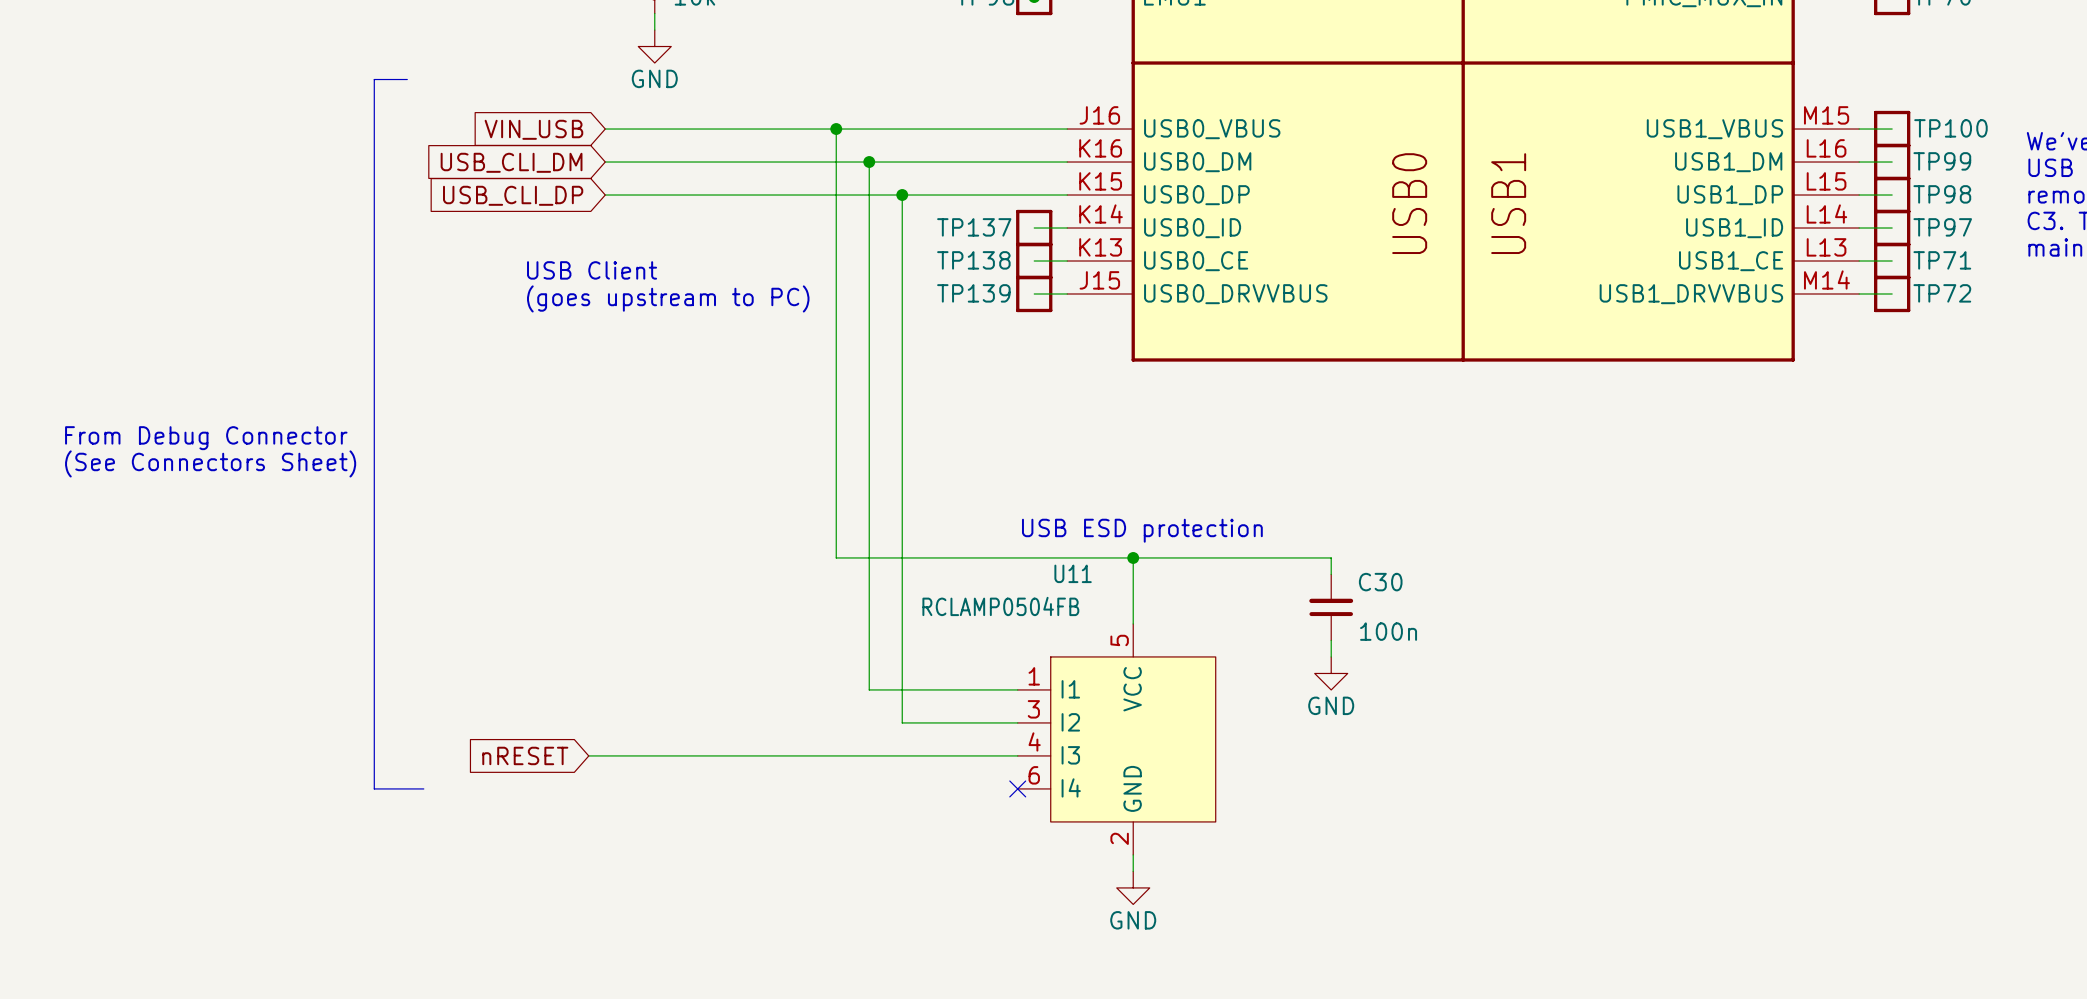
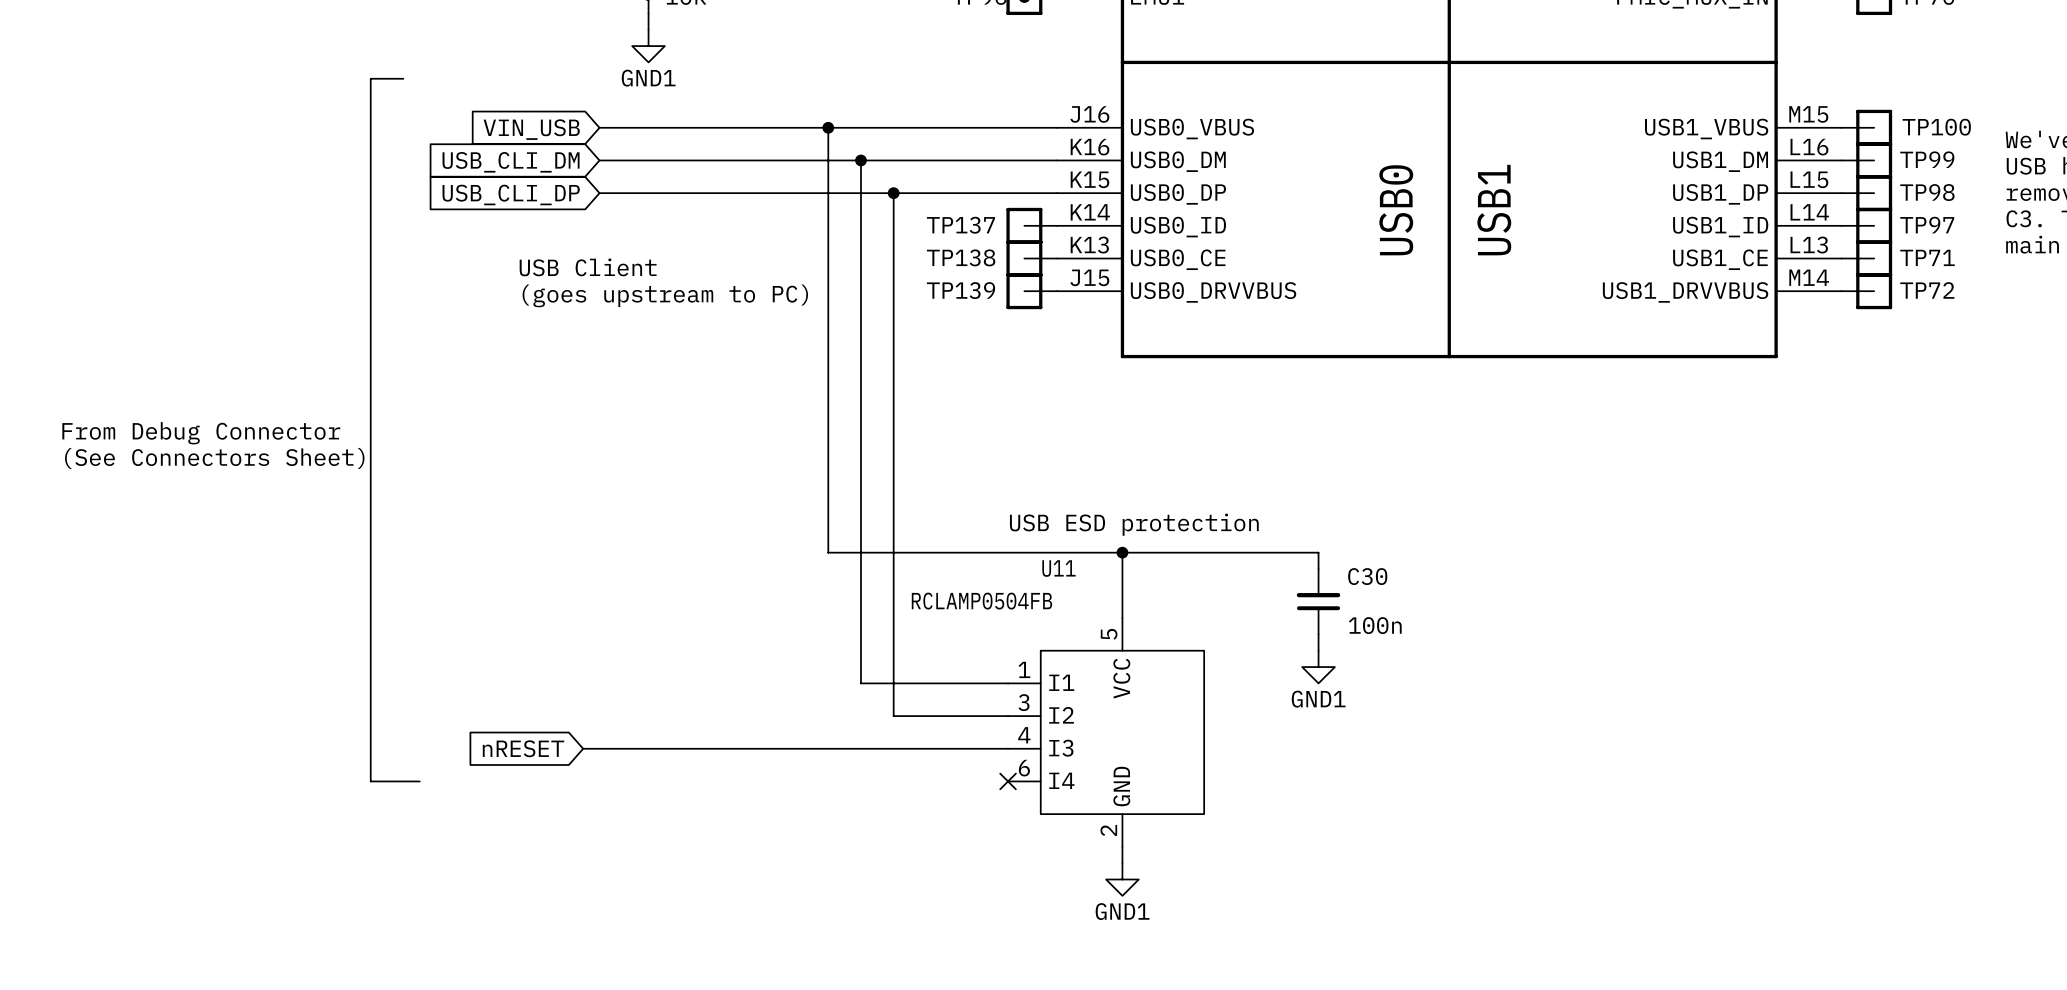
power symbol: GND (654, 46) -> GND1 (648, 46)
power symbol: GND (1331, 673) -> GND1 (1318, 667)
power symbol: GND (1133, 887) -> GND1 (1122, 879)

